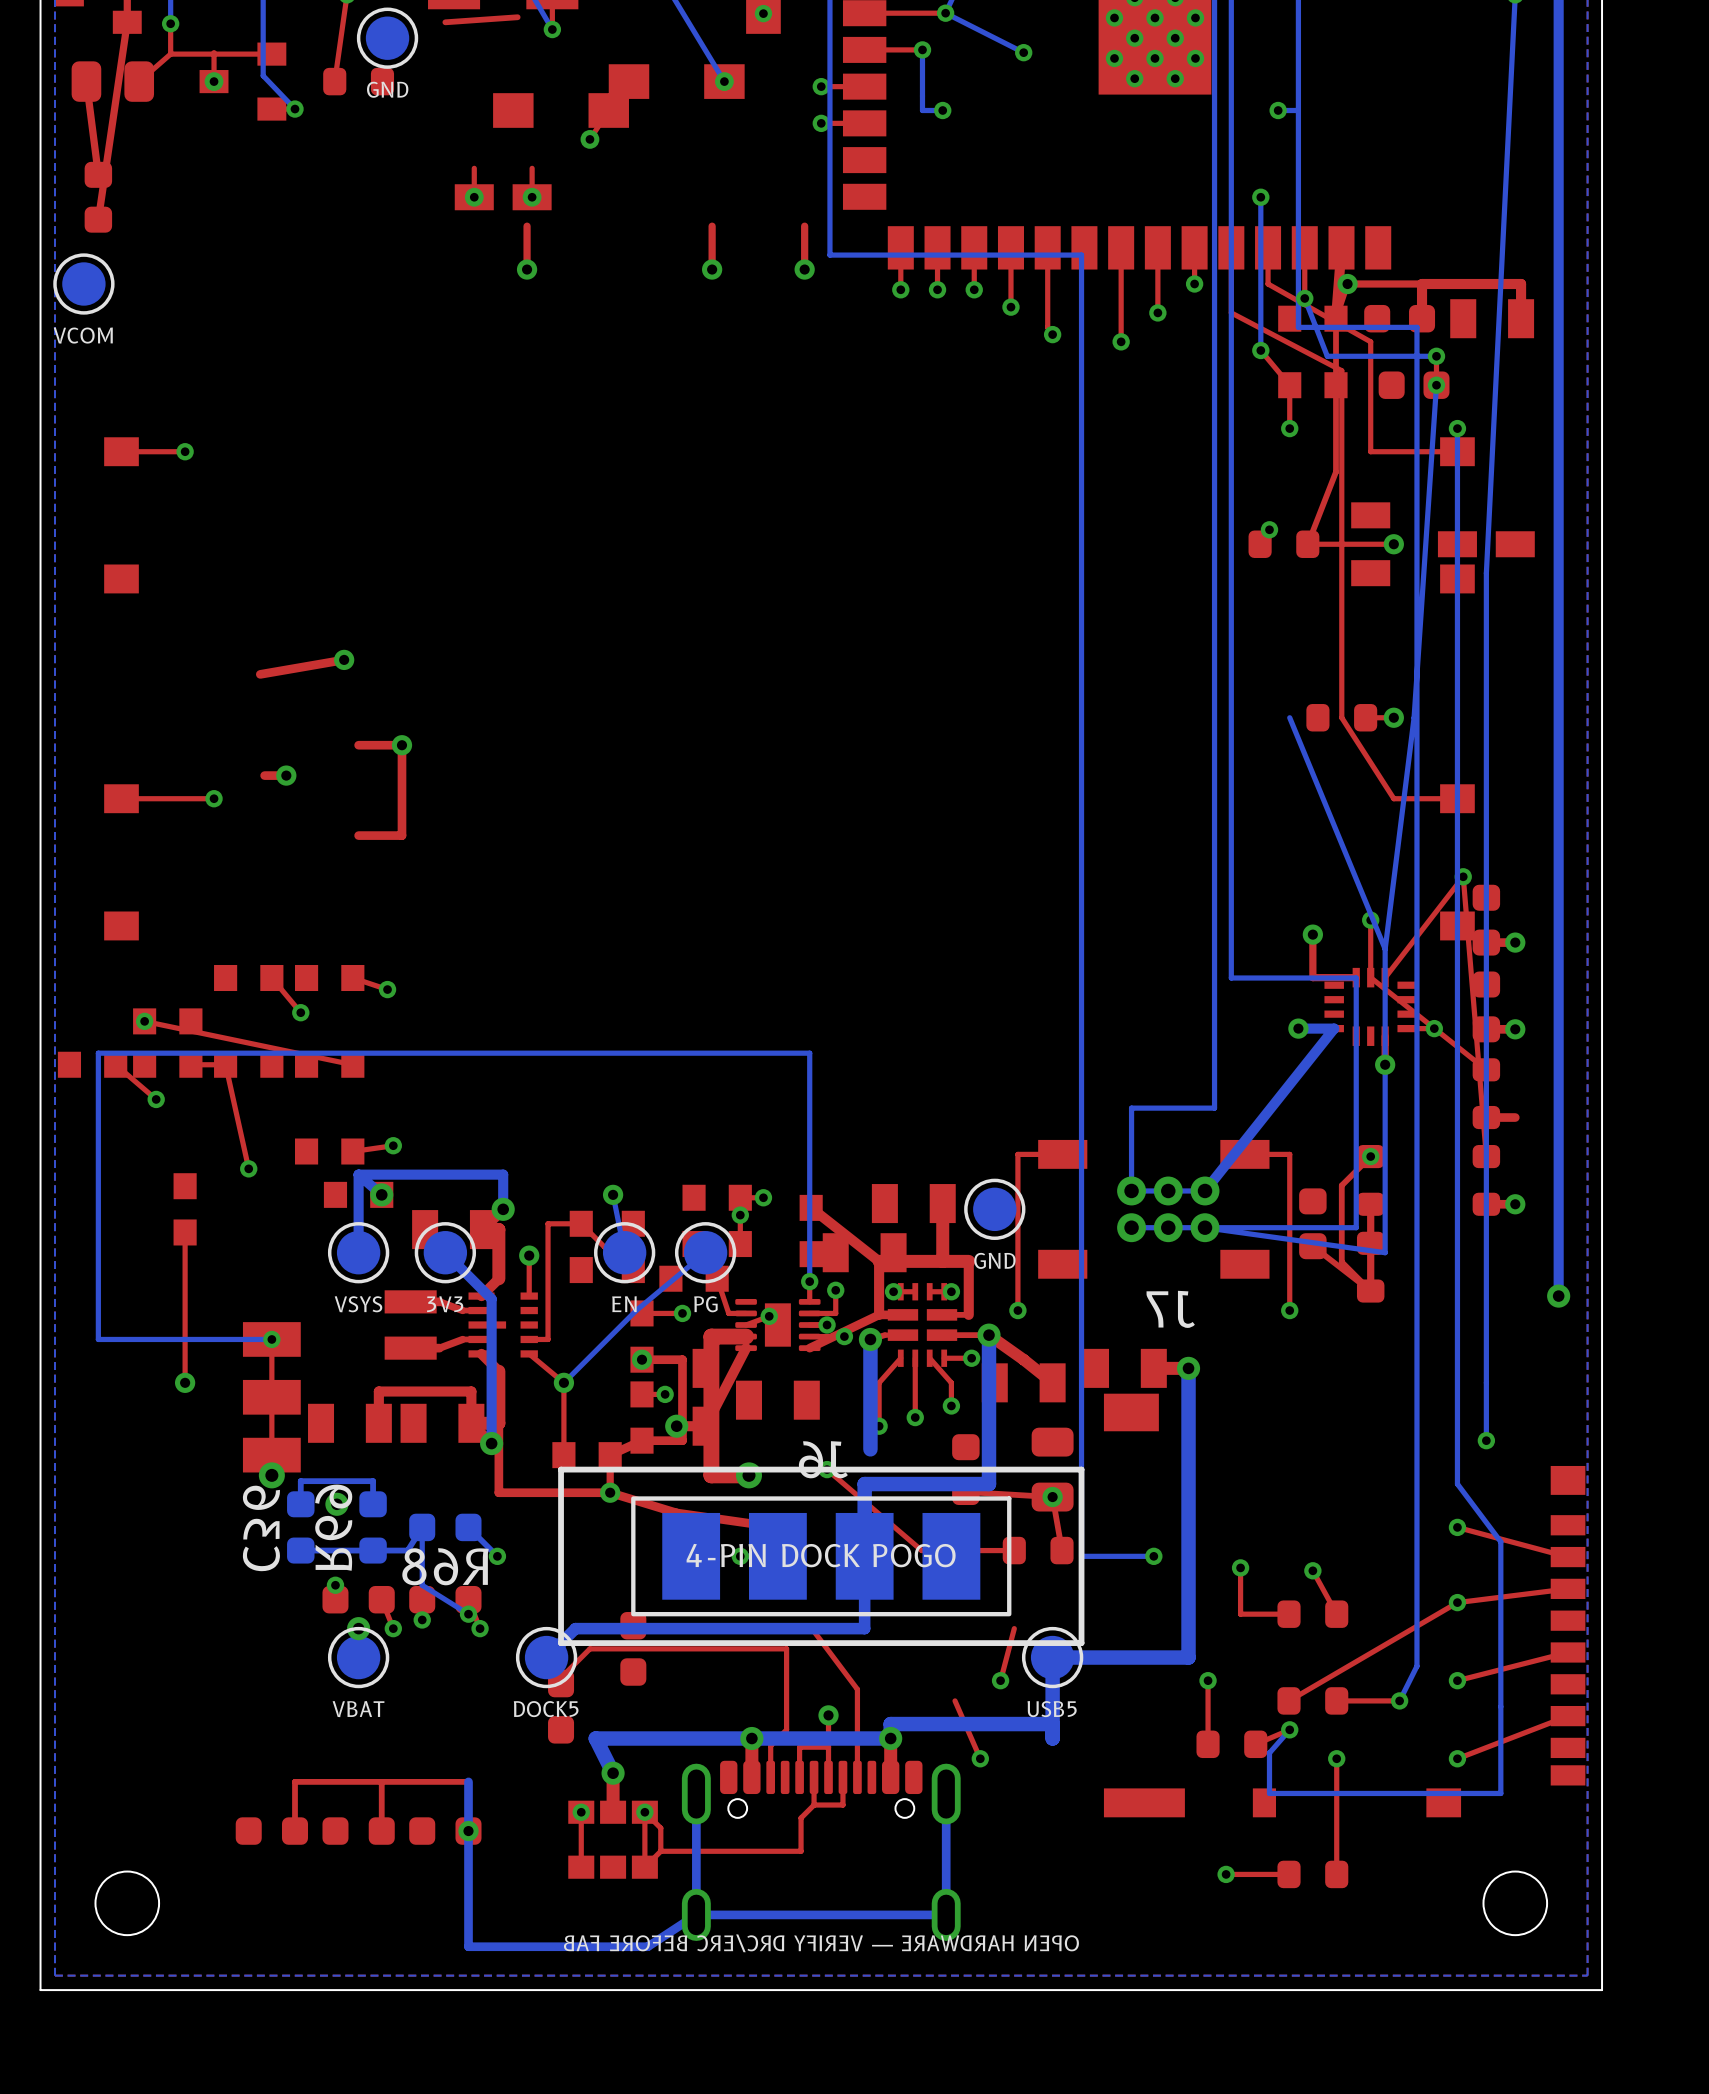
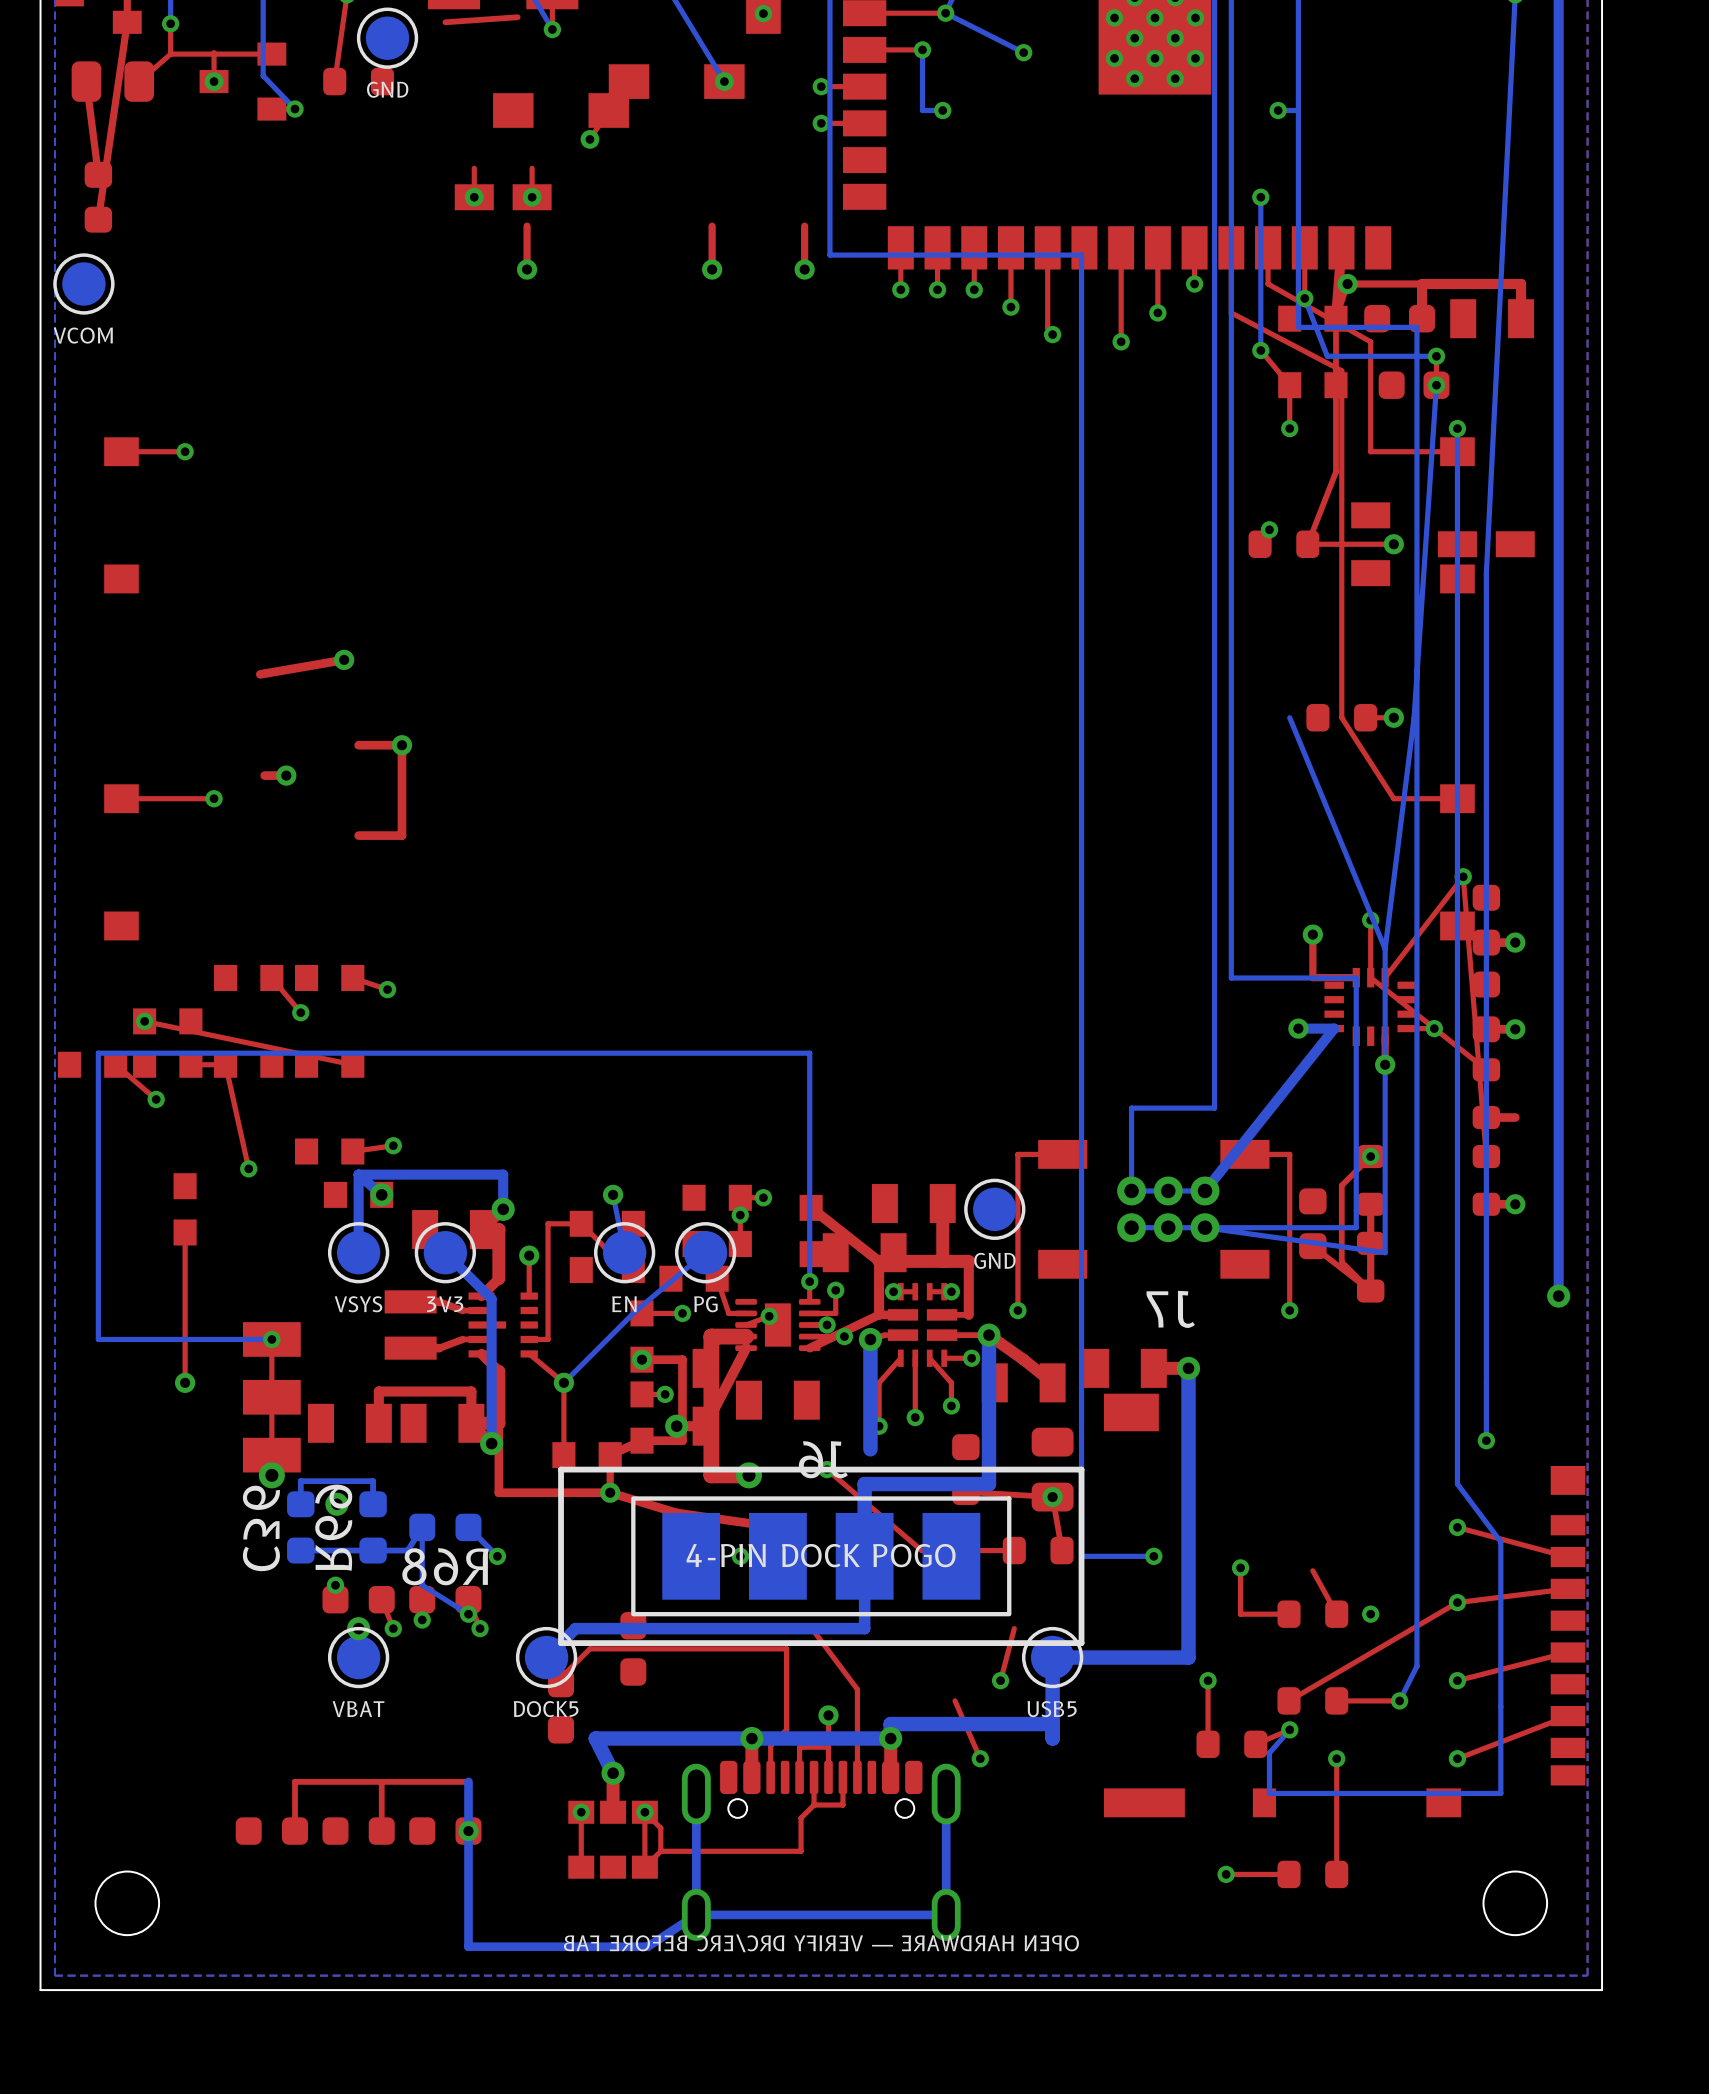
via position: (1312, 1570) -> (1370, 1614)

